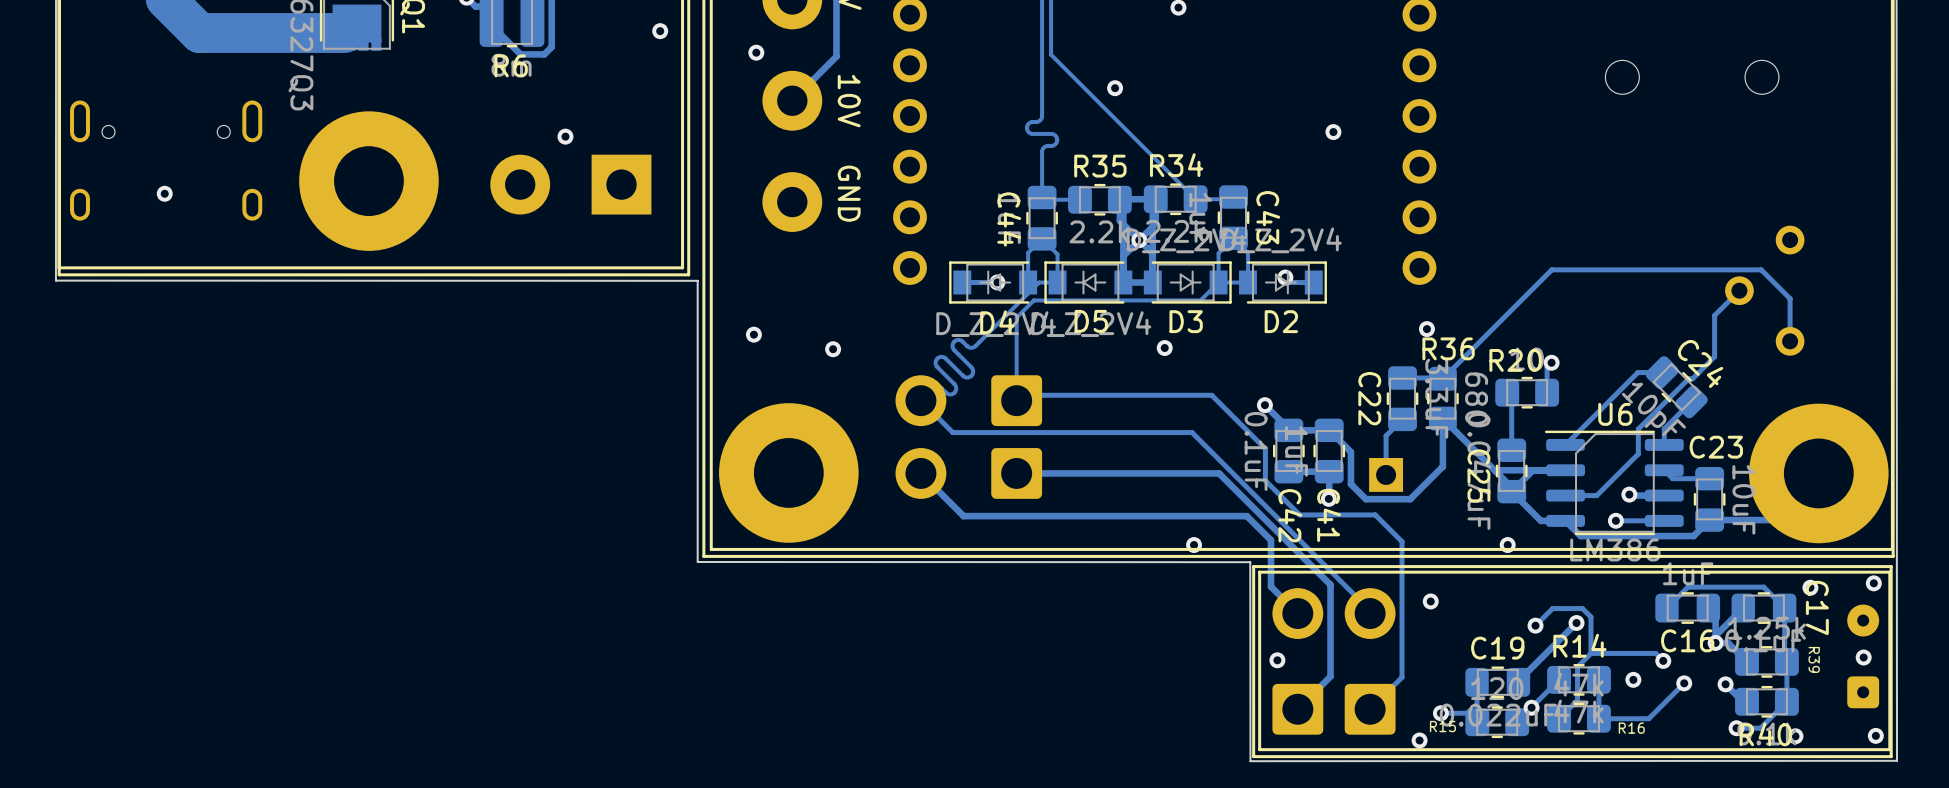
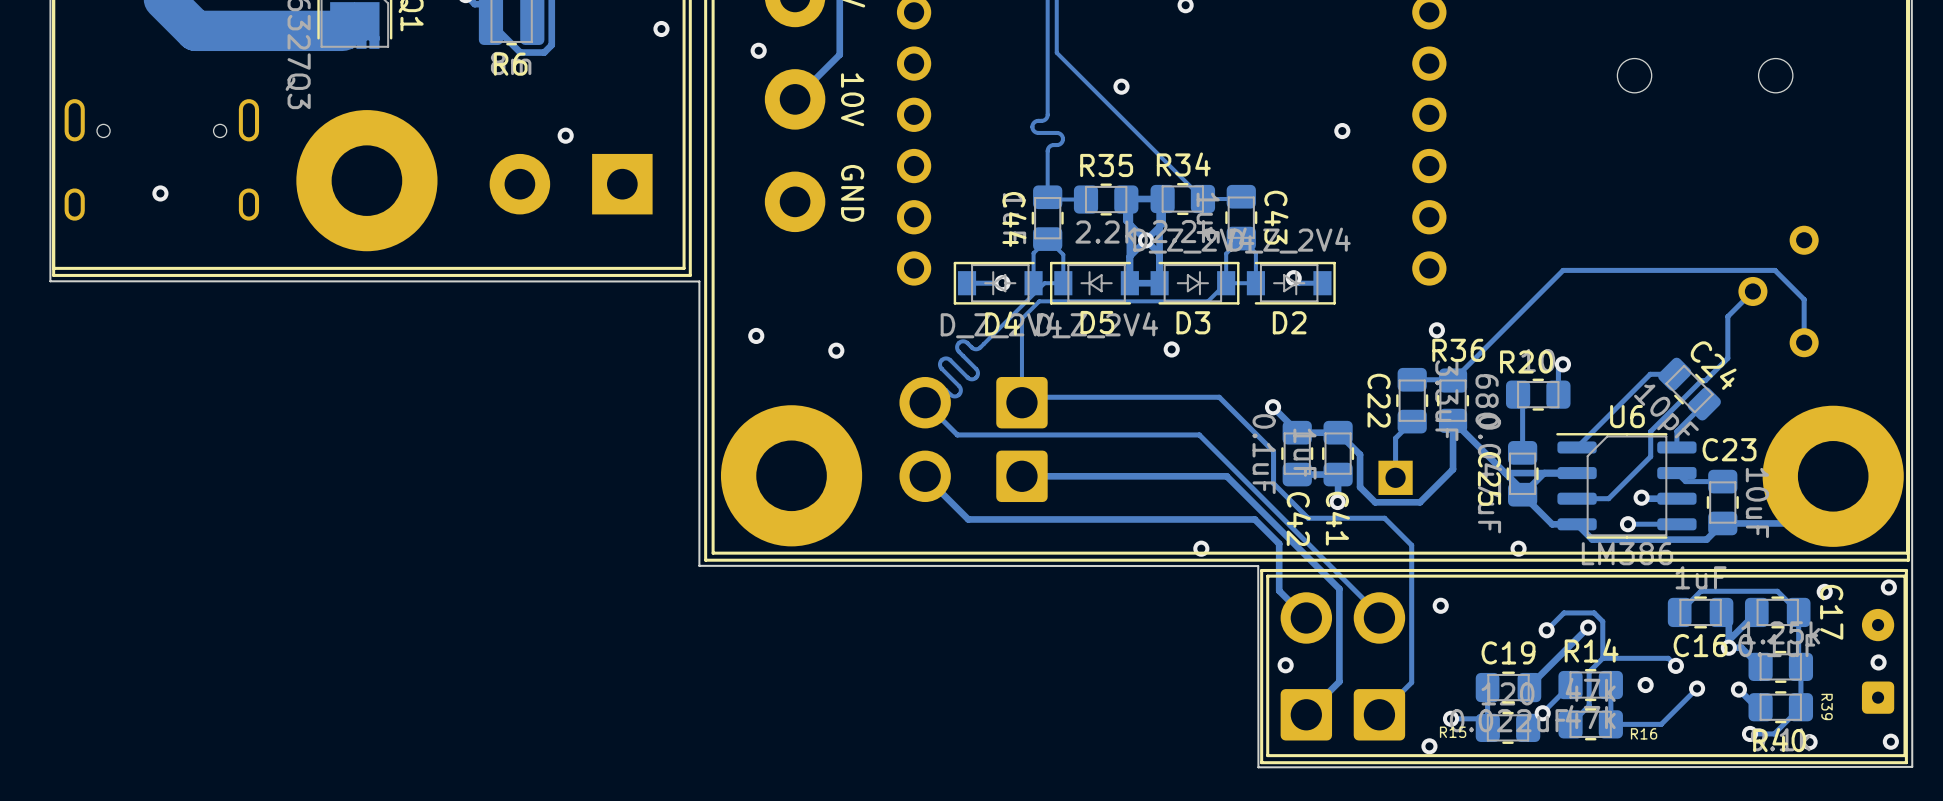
R39 name position: R39 (1814, 659) -> R39 (1827, 706)

